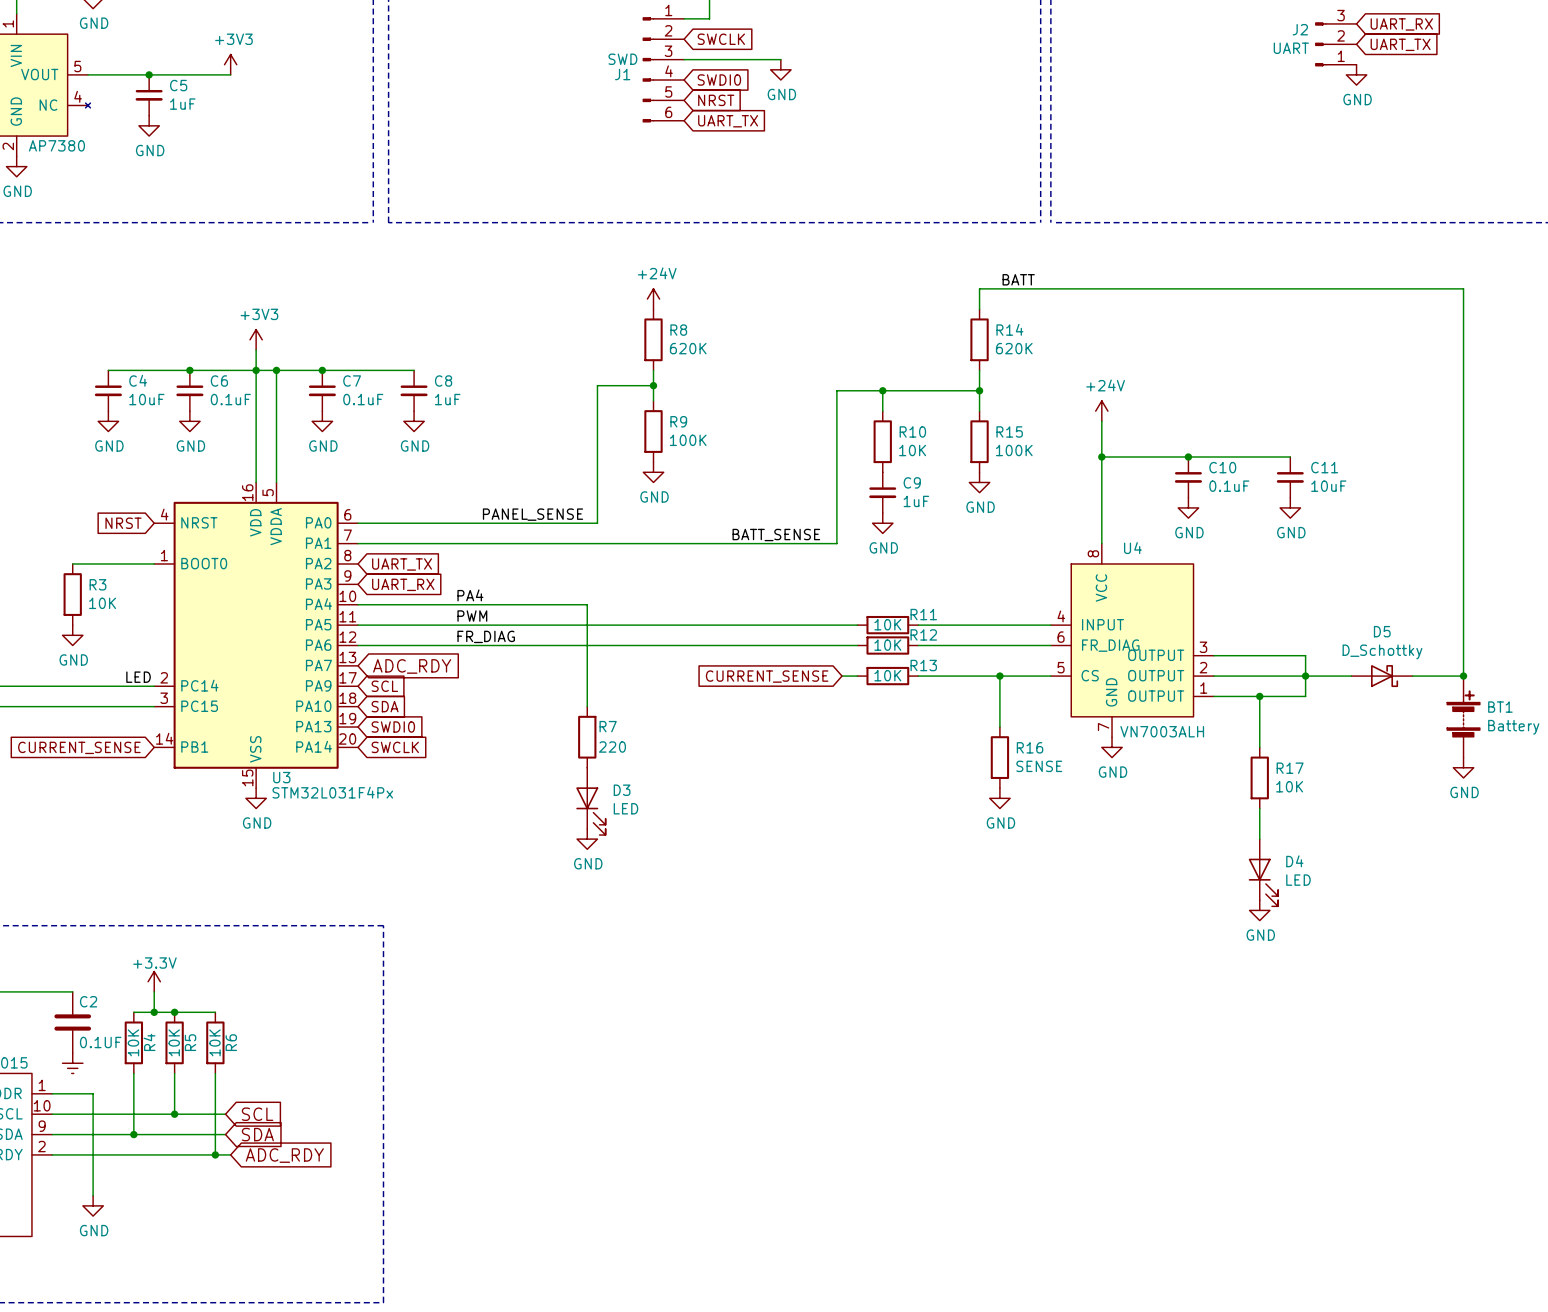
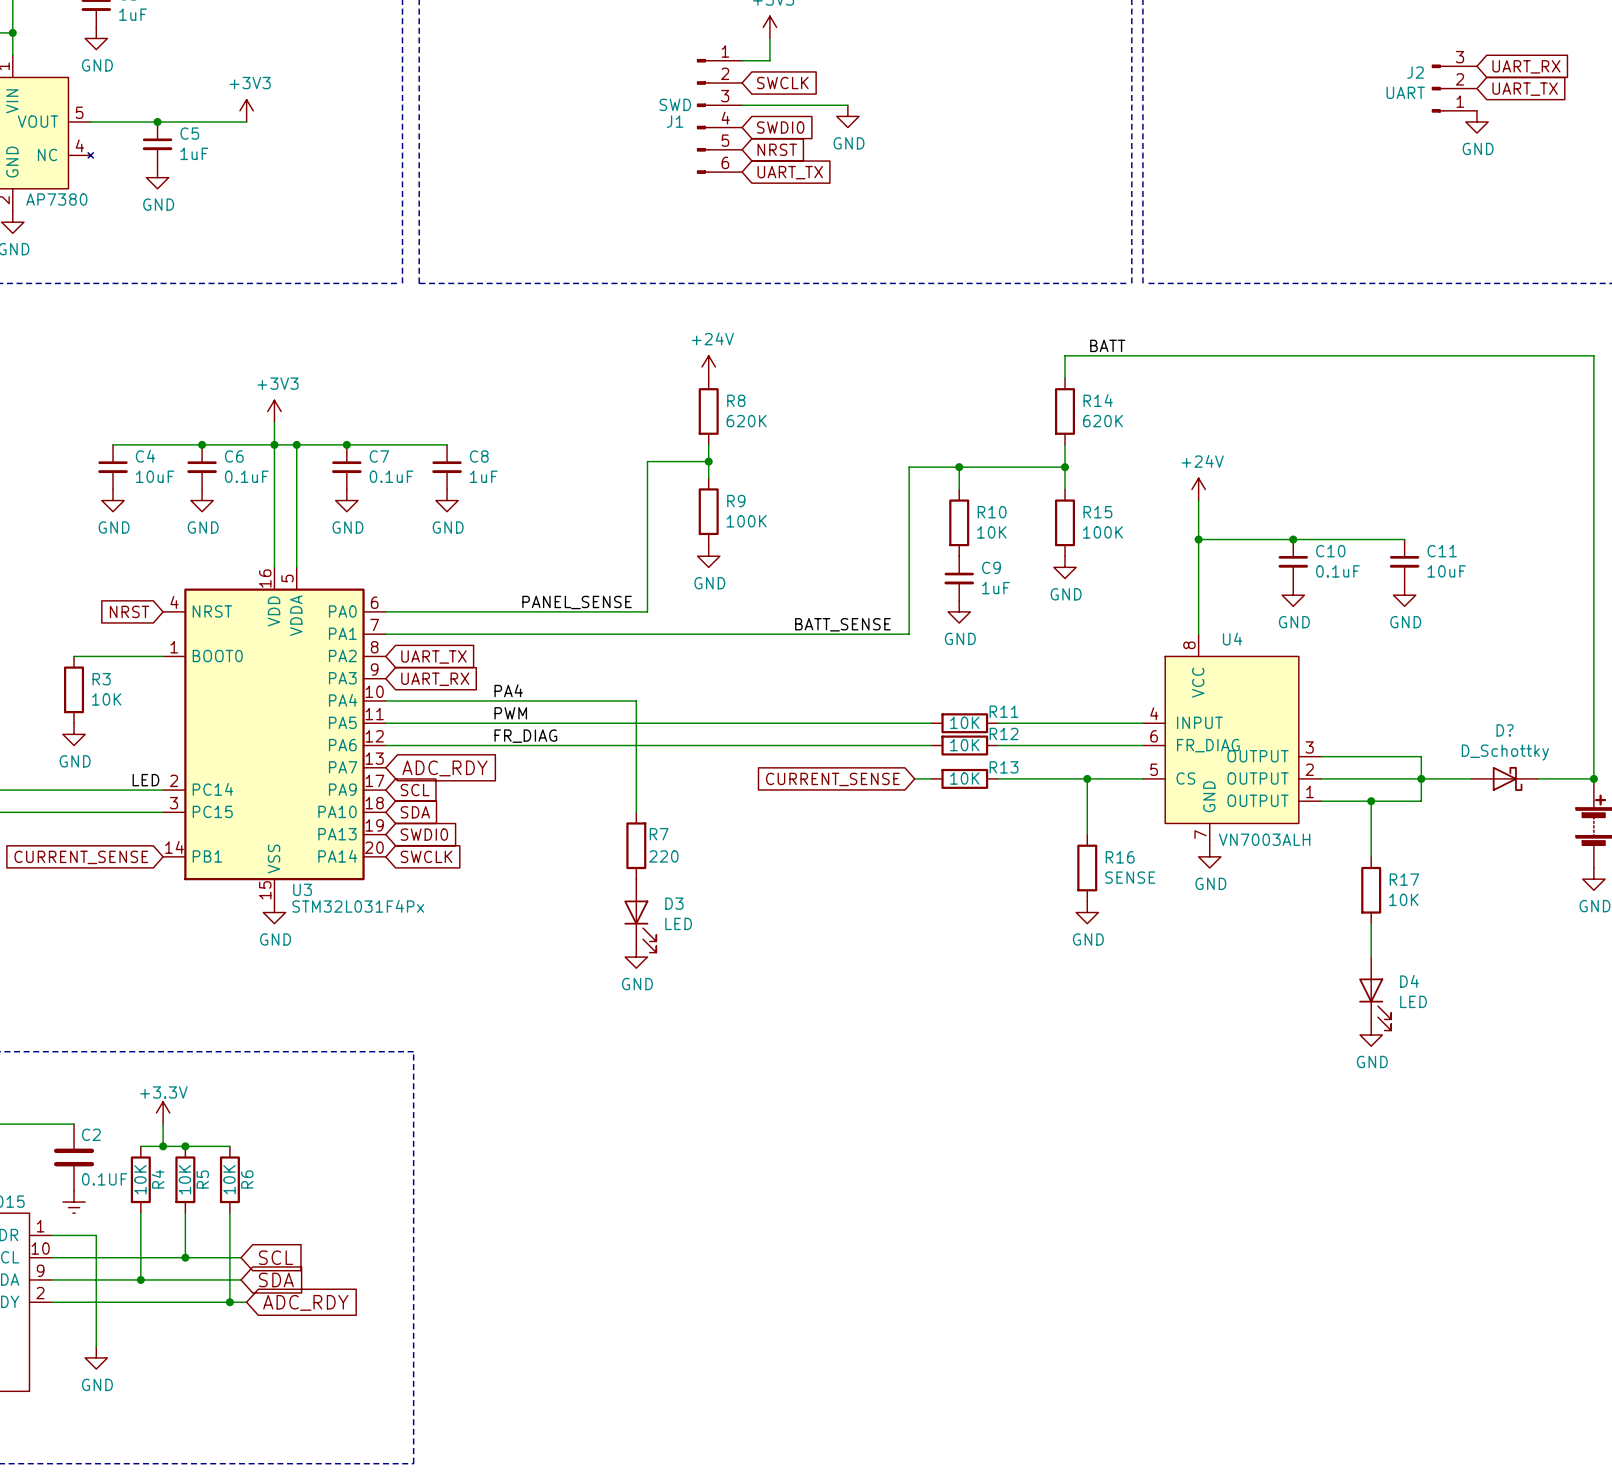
D5 name: D5 (1382, 631) -> D? (1505, 730)

